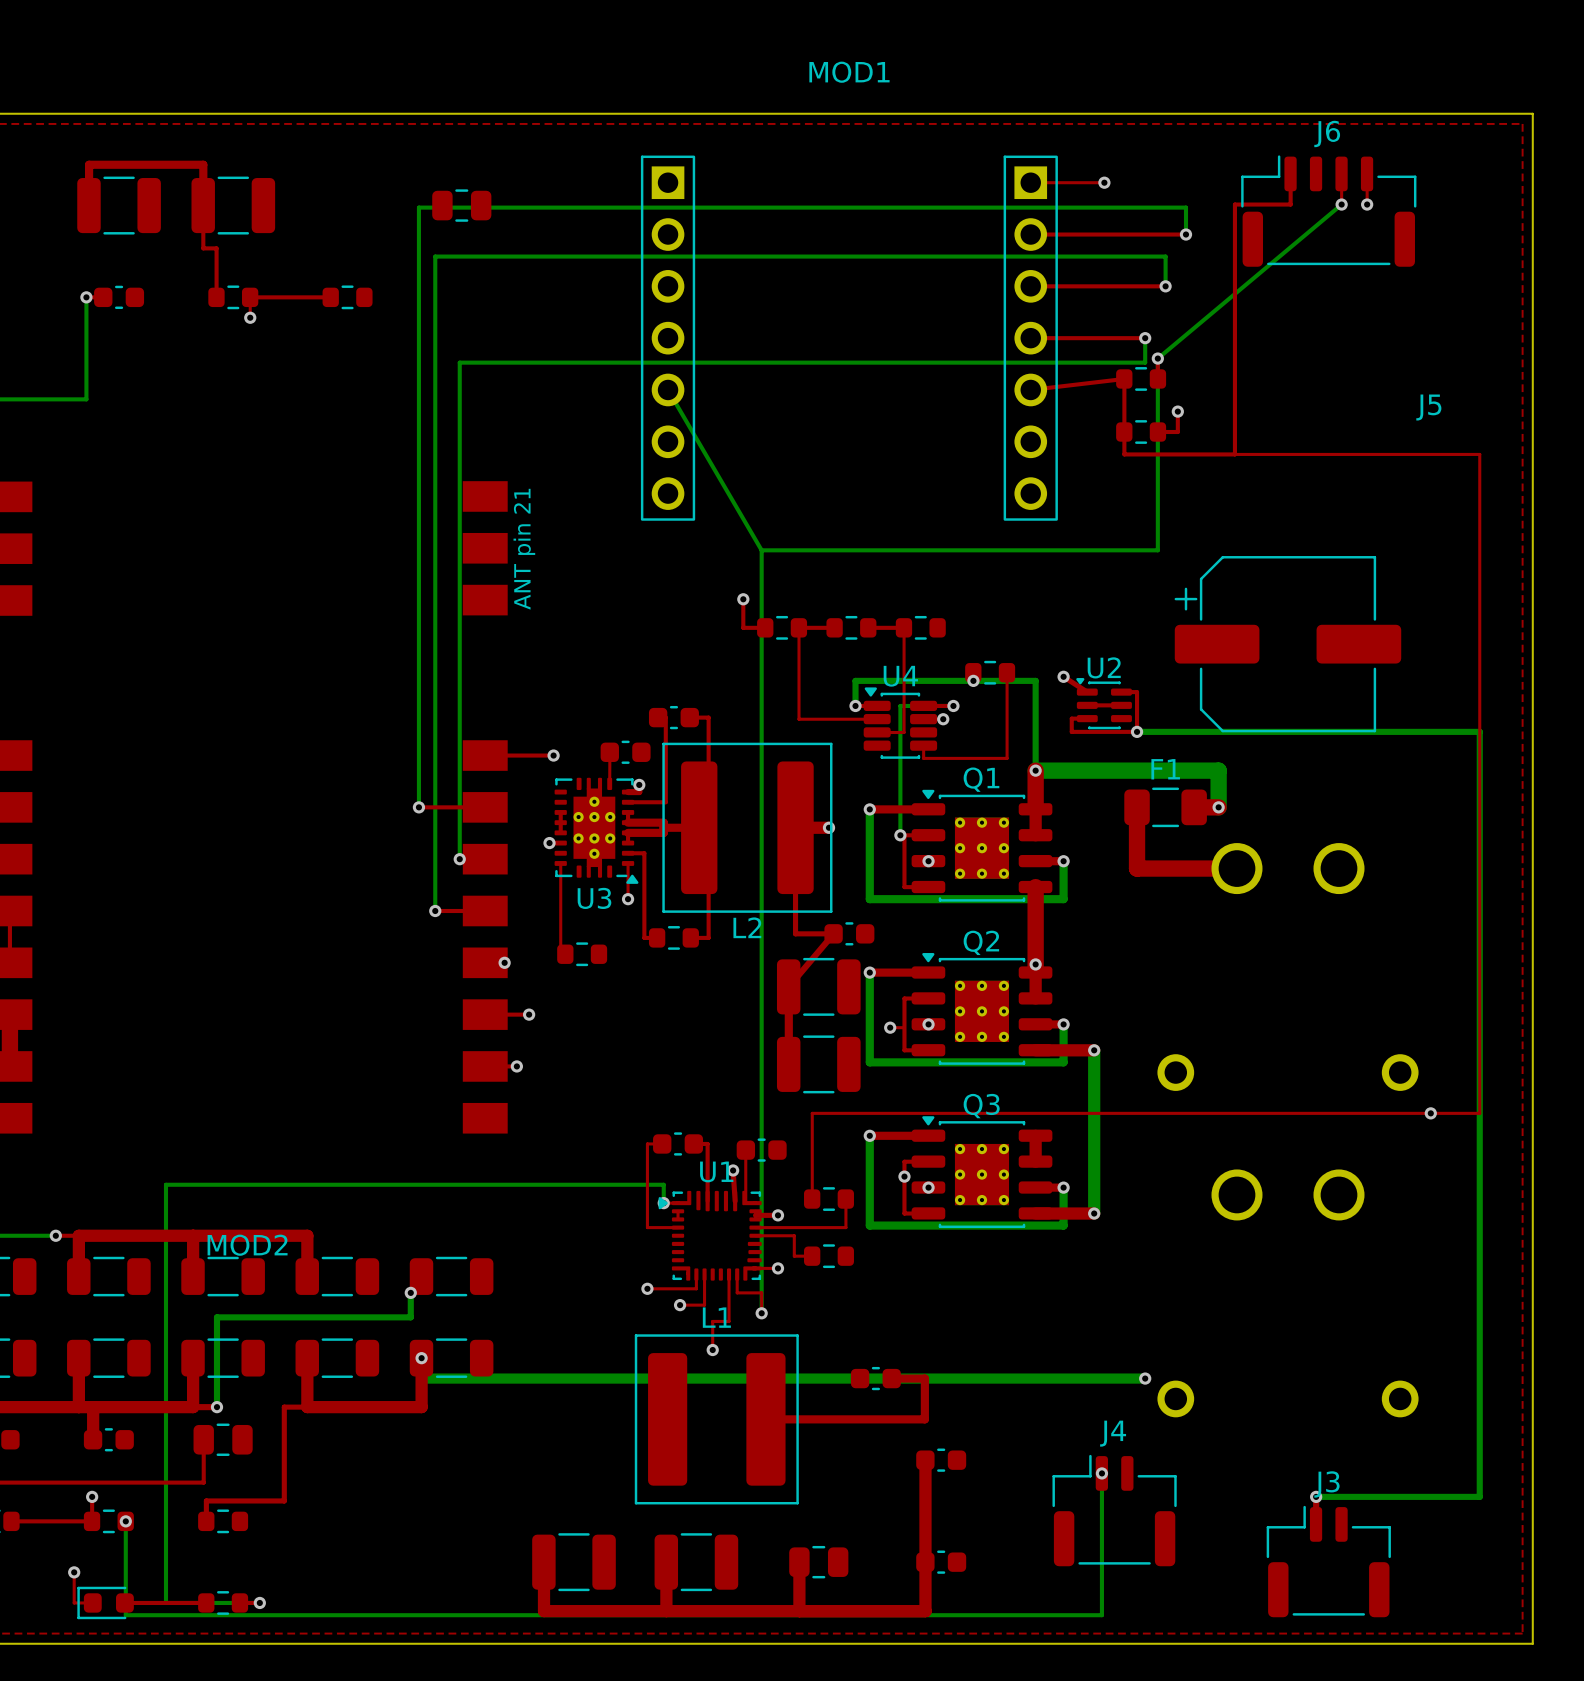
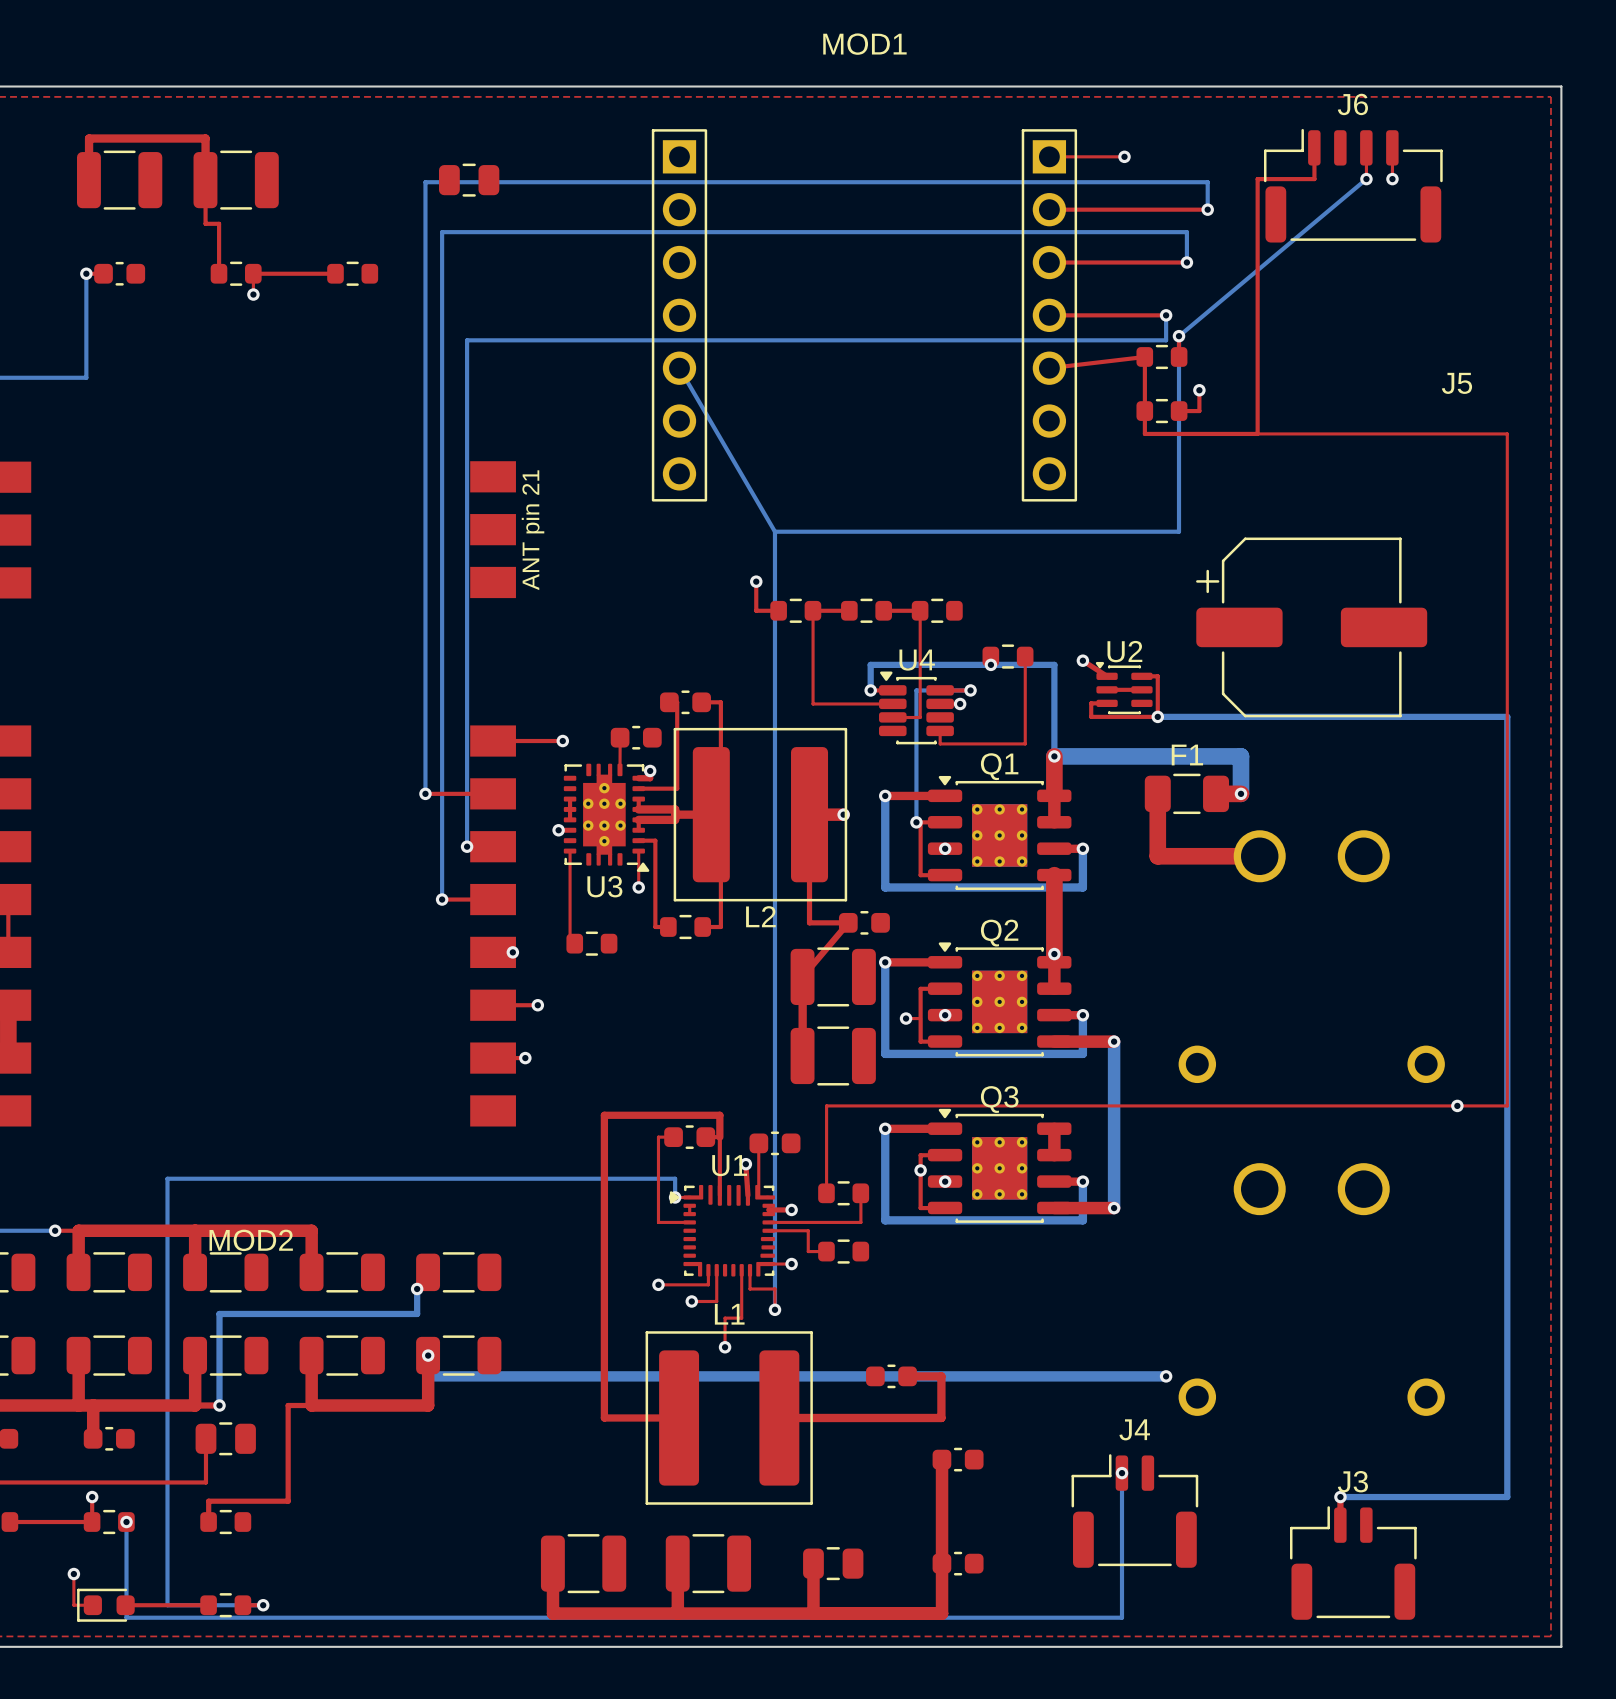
top track: none -> (719, 1137) (719, 1115) (604, 1115) (604, 1417) (679, 1417)

